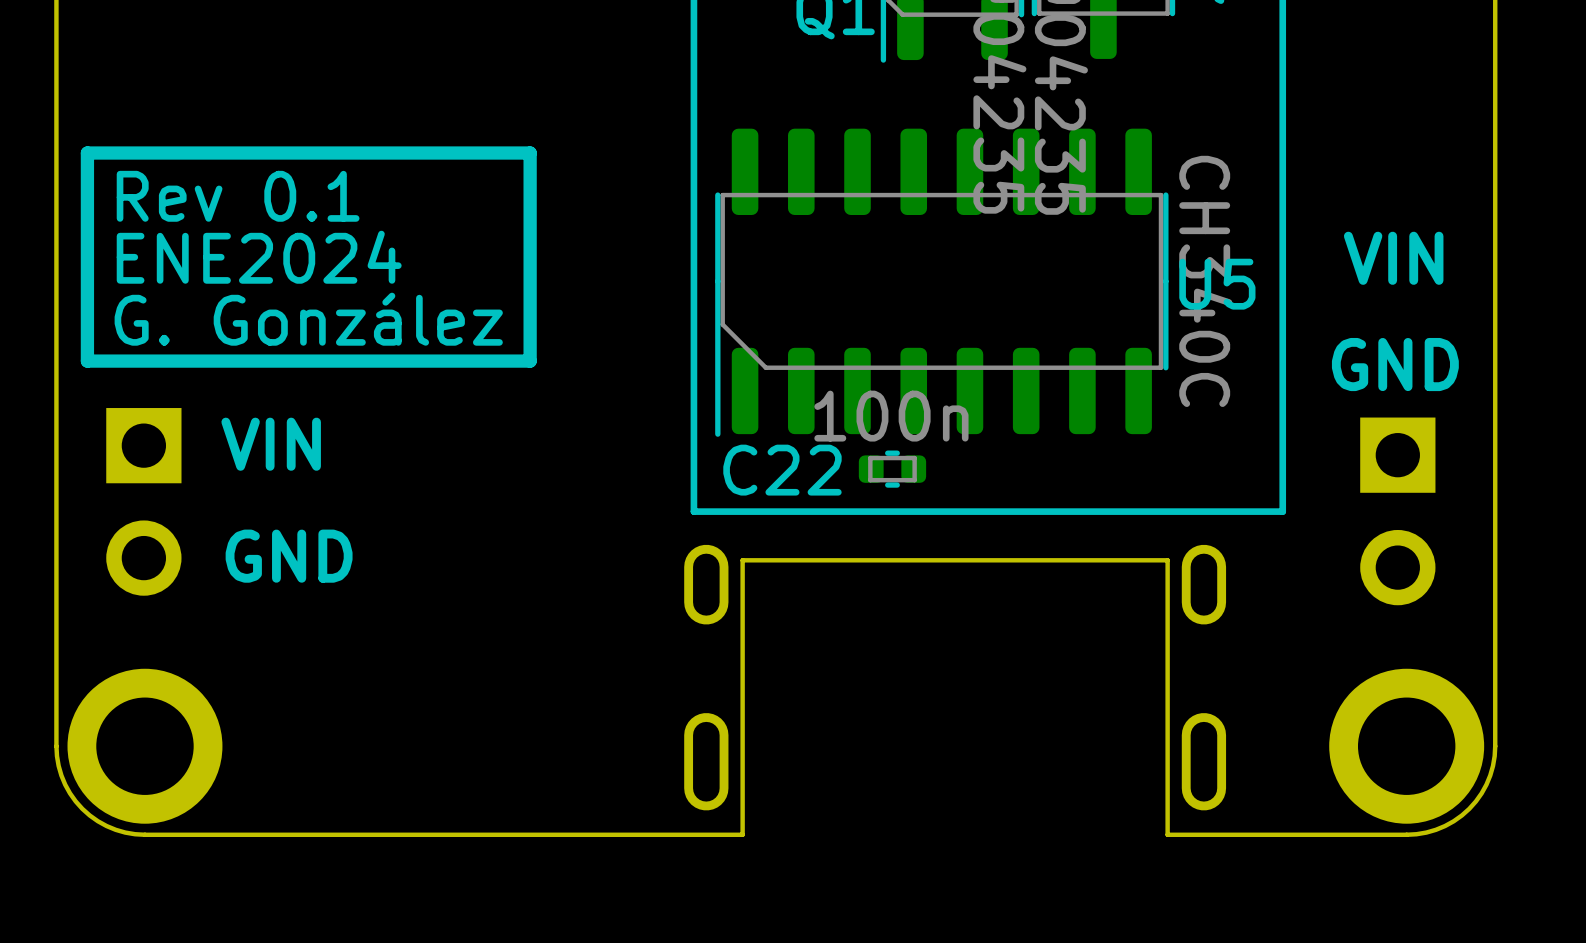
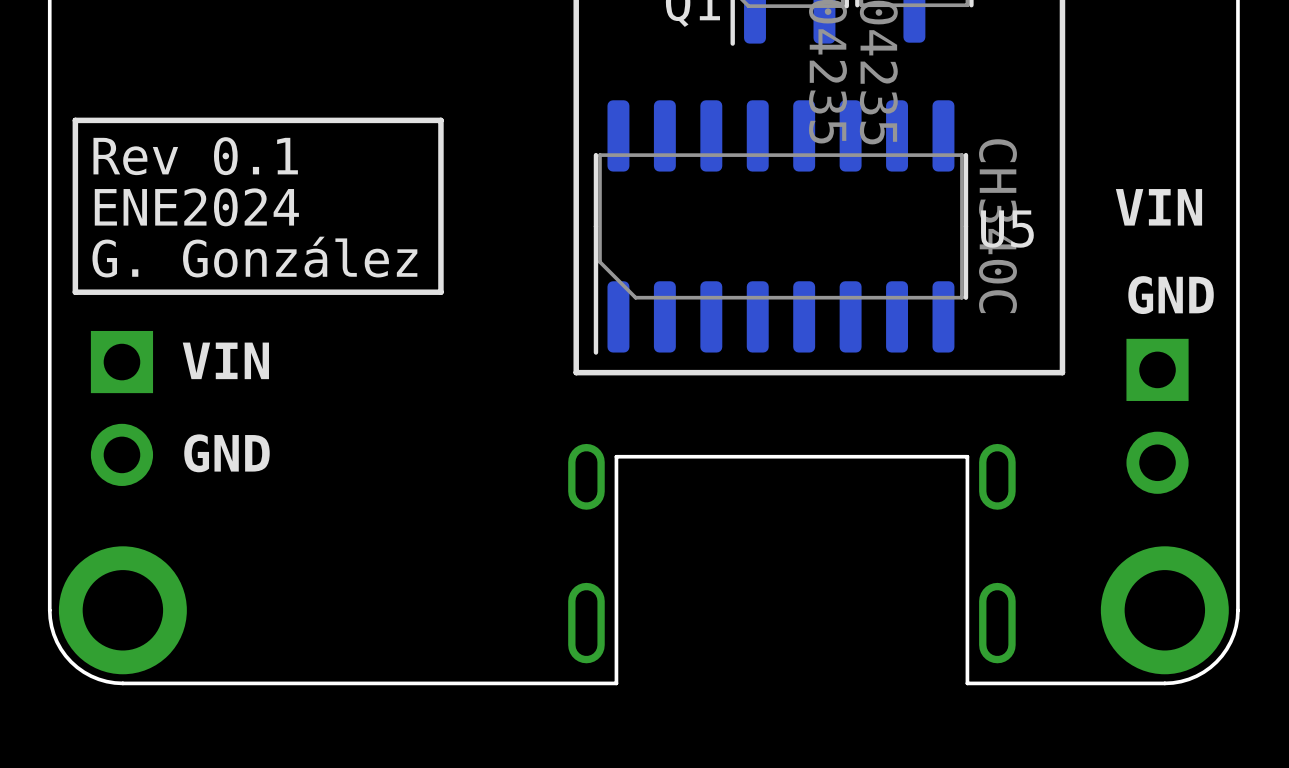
line width: thick (530, 153) (87, 153) (87, 361) (530, 361) (530, 153) -> thin (440, 120) (75, 120) (75, 292) (440, 292) (440, 120)
line: (1282, 458) (1282, 511) (693, 511) (693, 458) -> (1062, 372) (576, 372)
C22: 100n (892, 469) -> none

